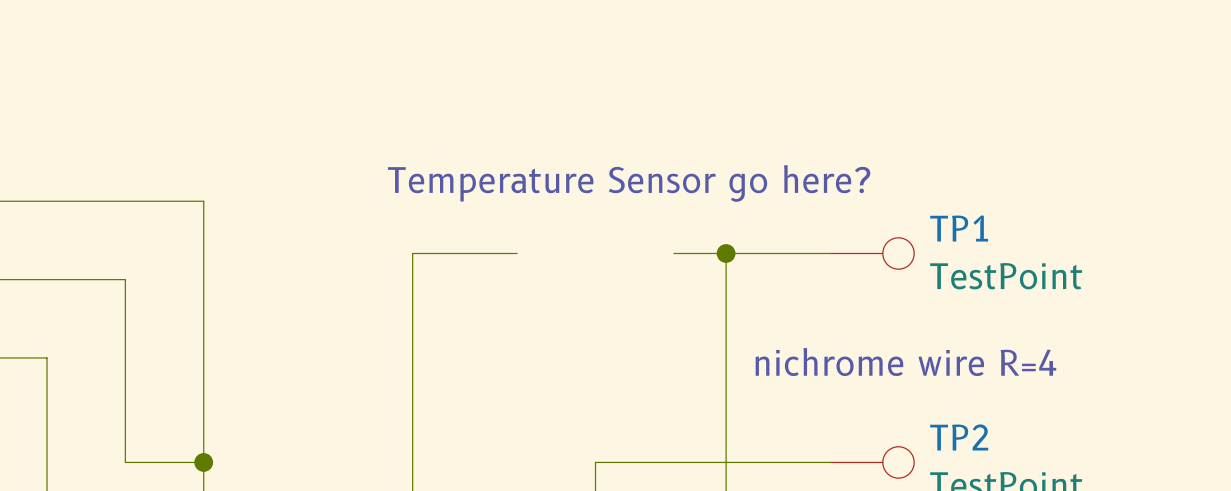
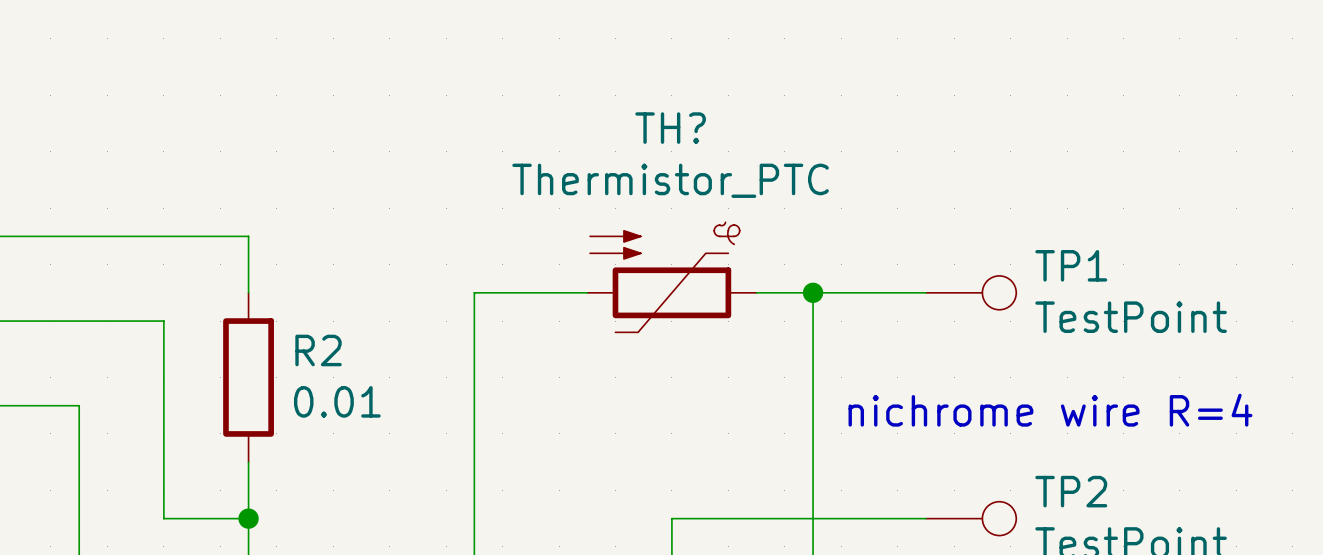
text: Temperature Sensor go here? (629, 183) -> none
TH?: none -> Thermistor_PTC (671, 277)
wire: (203, 253) (203, 410) -> none
R2: none -> 0.01 (248, 377)

